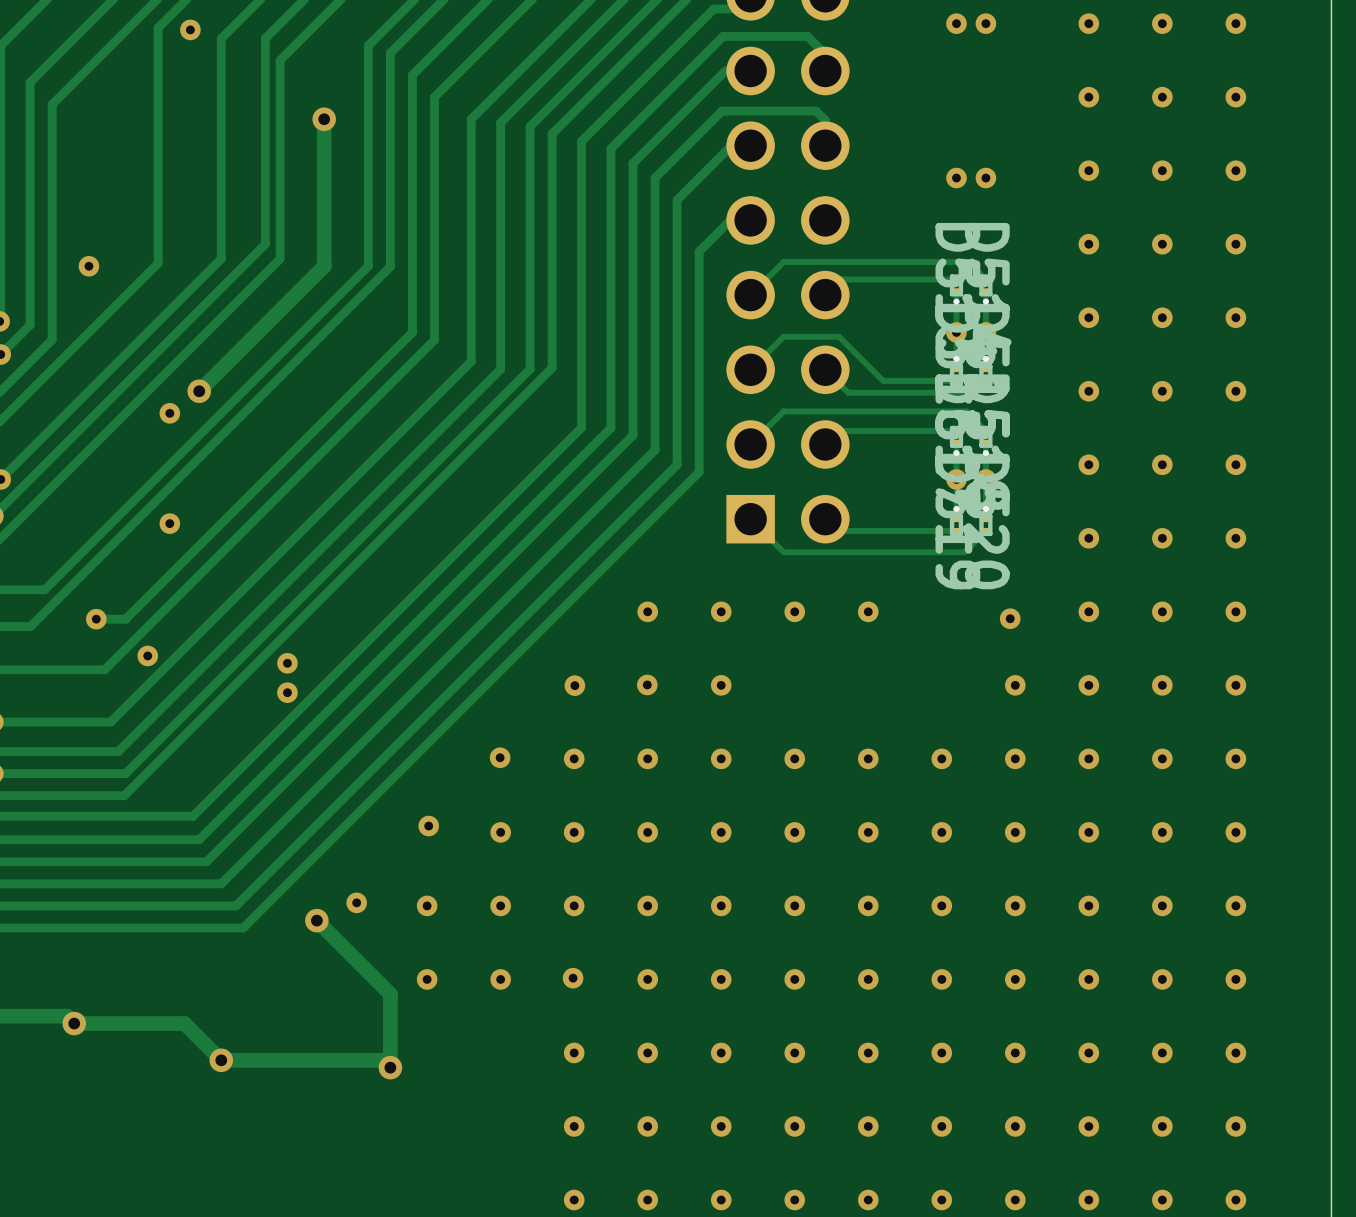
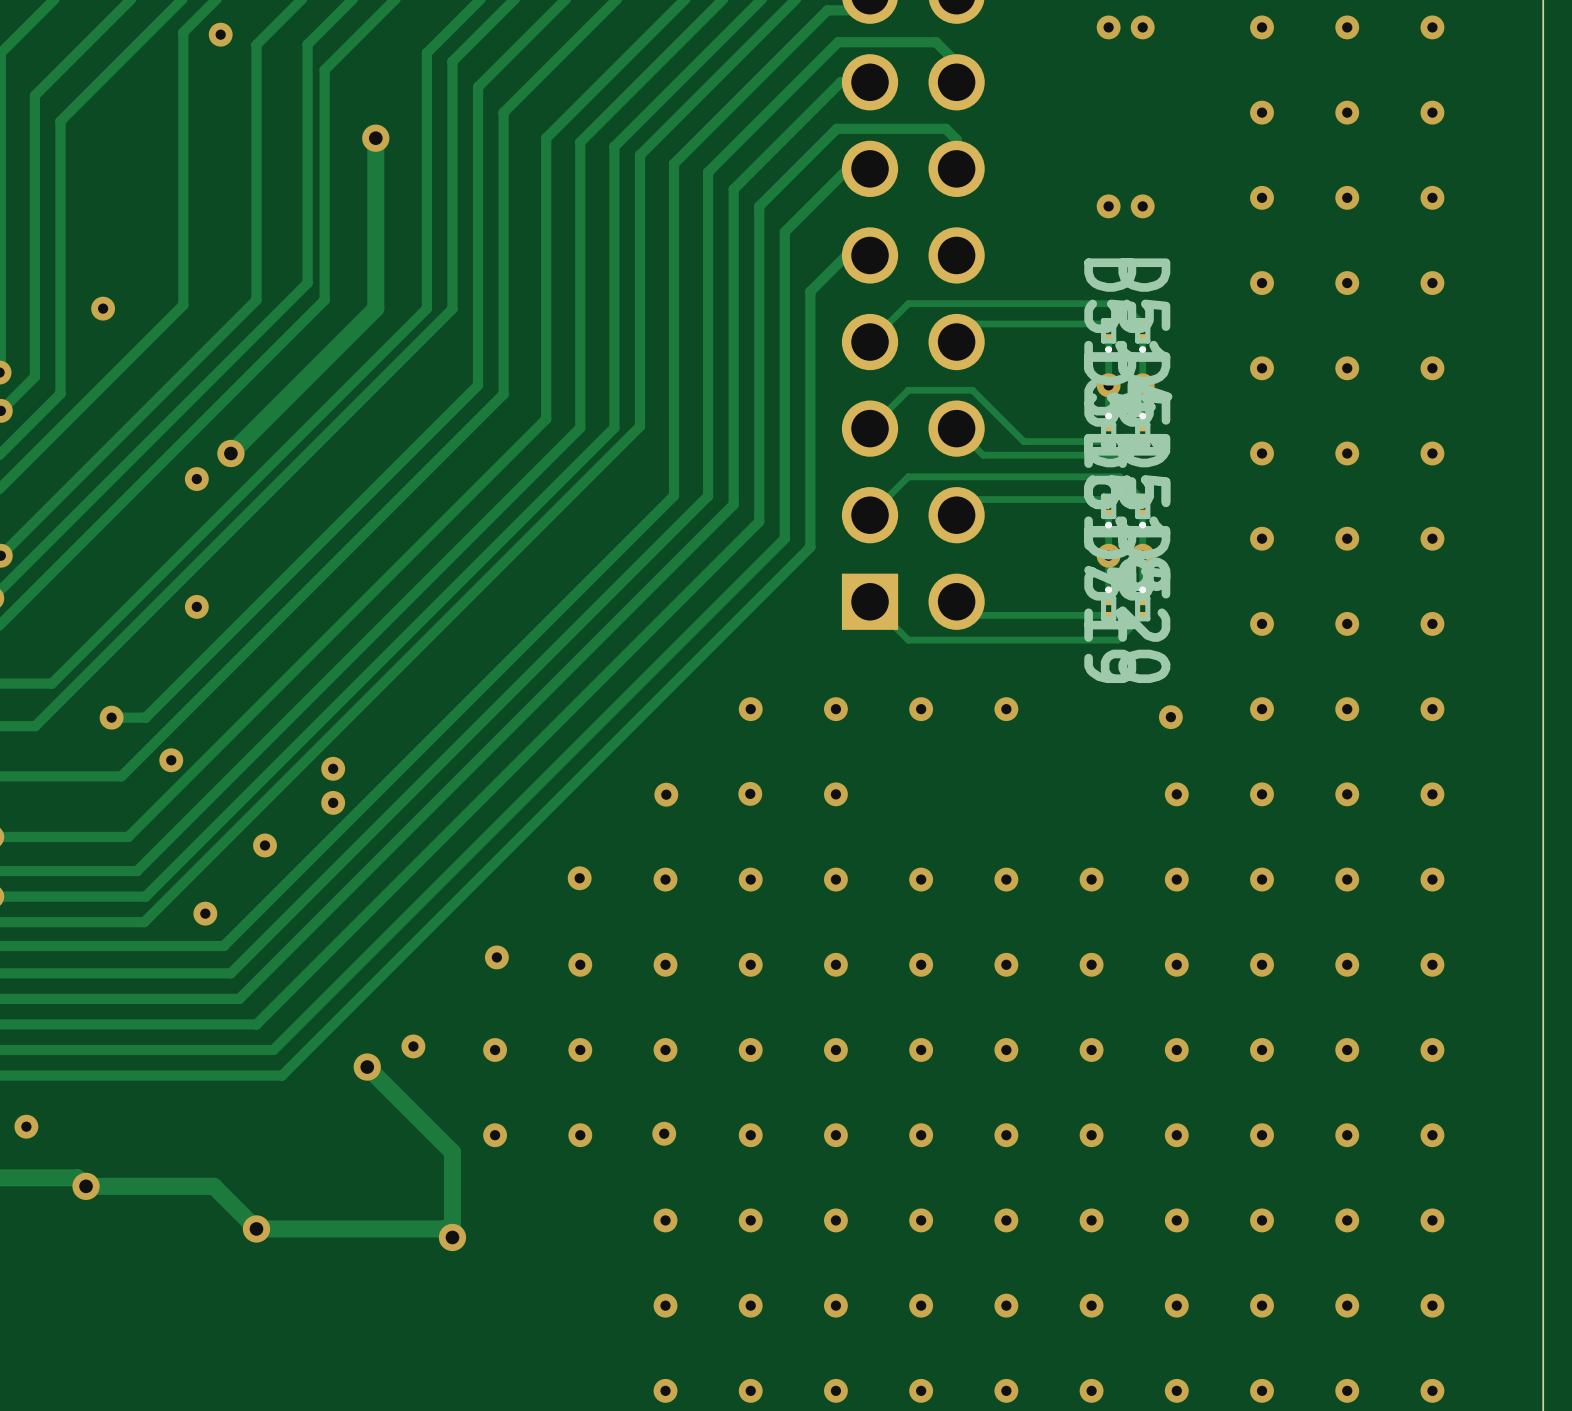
via: none -> (265, 845)
via: none -> (205, 913)
via: none -> (26, 1126)

